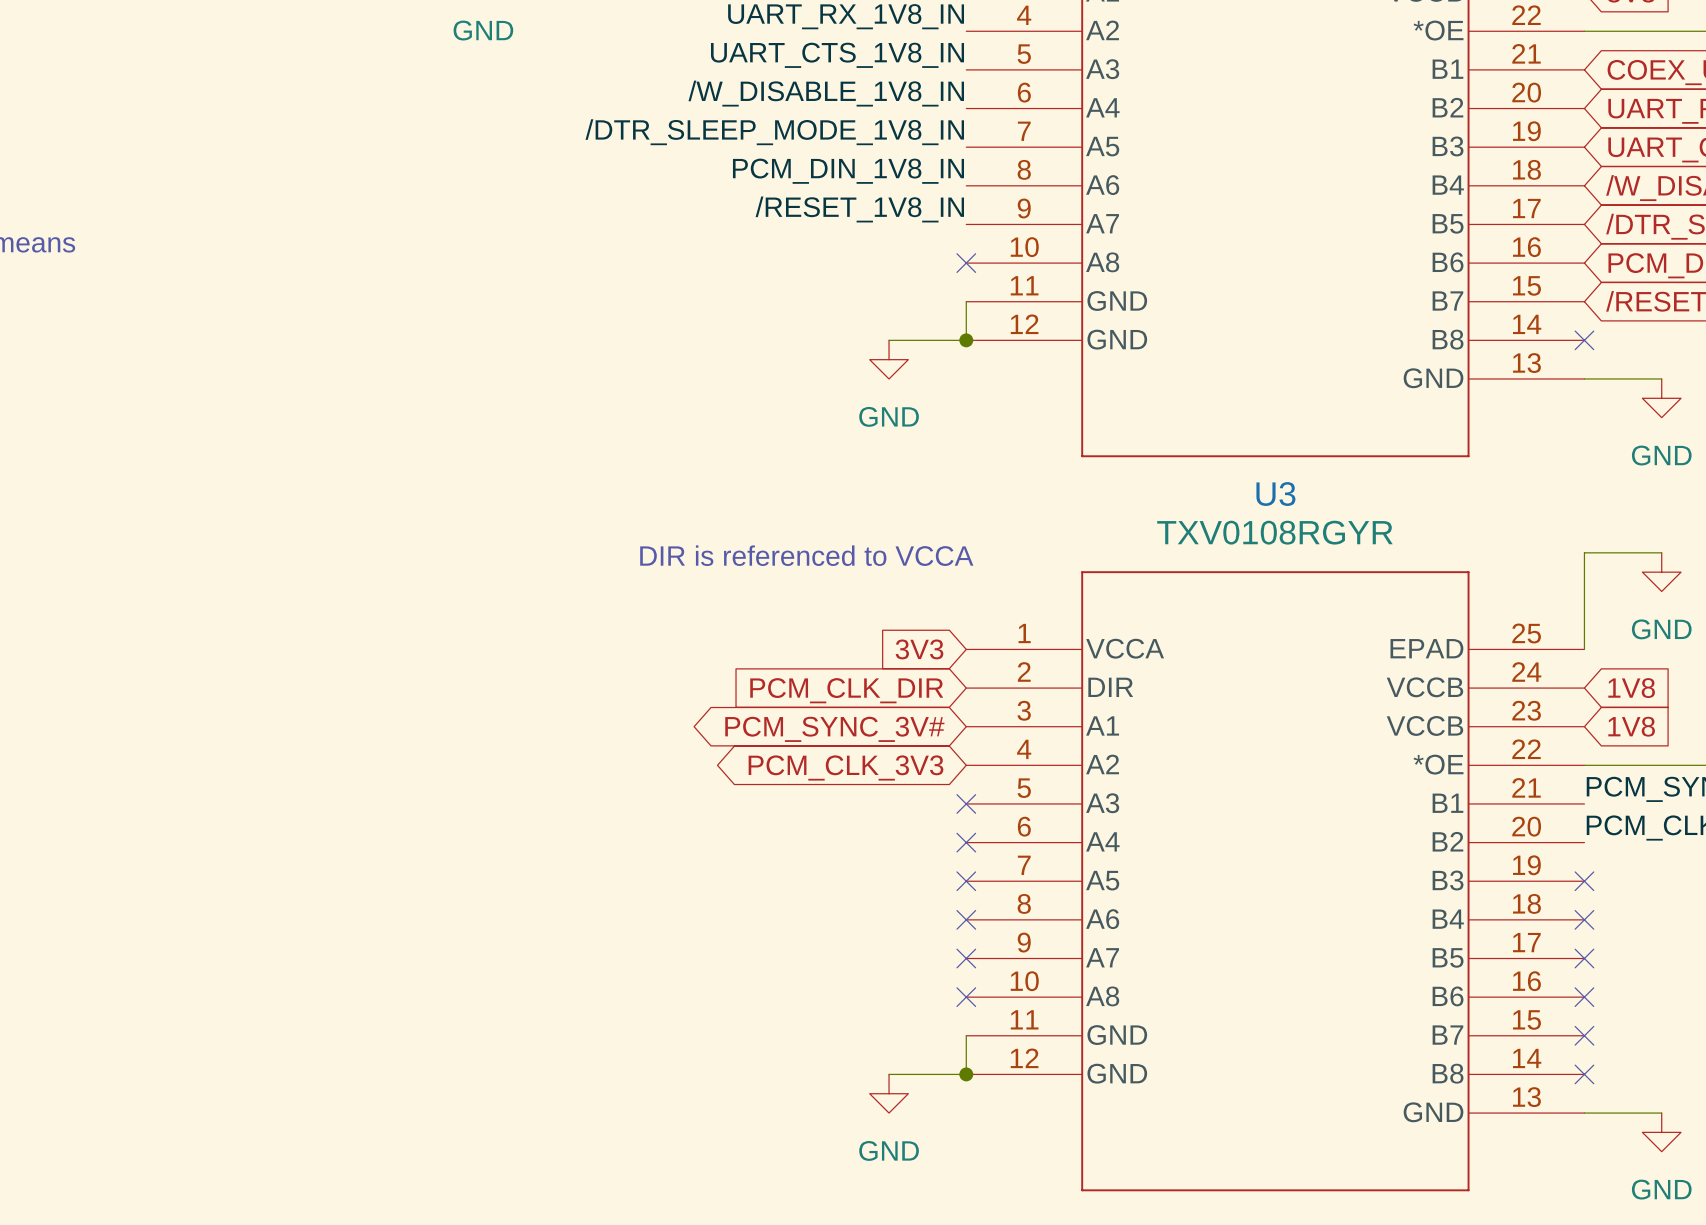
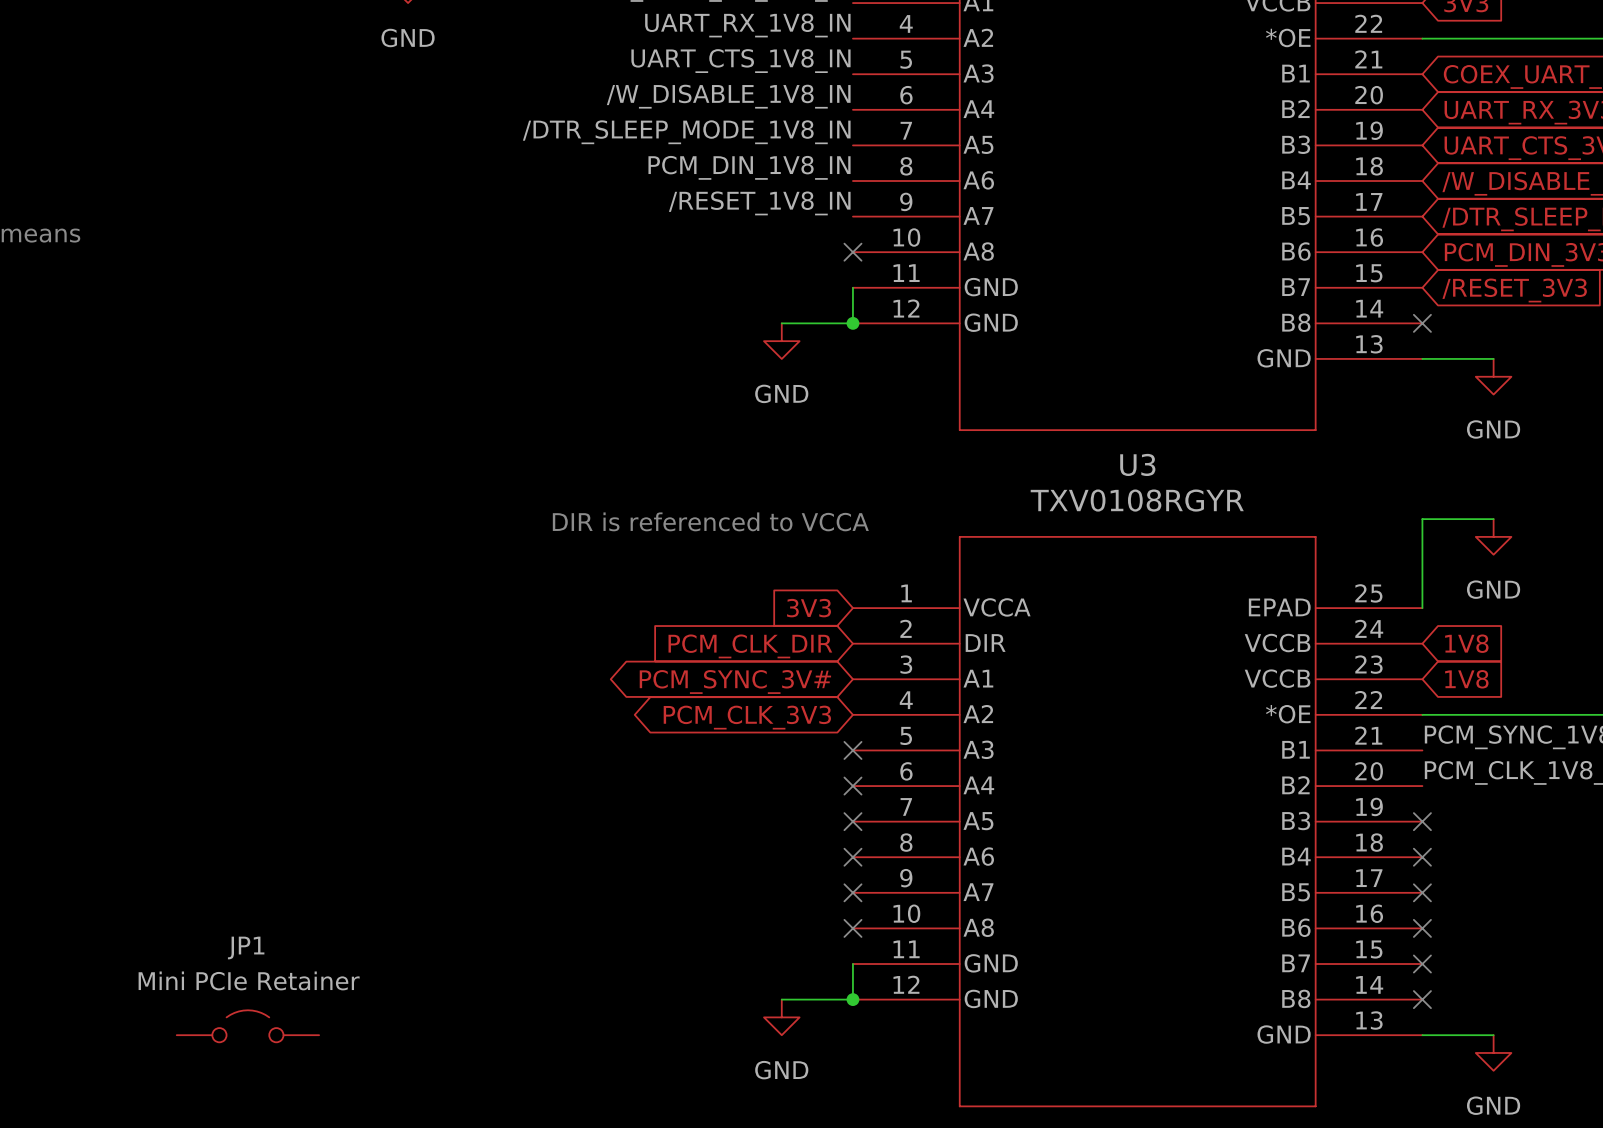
JP1: none -> Mini PCIe Retainer (247, 1026)

